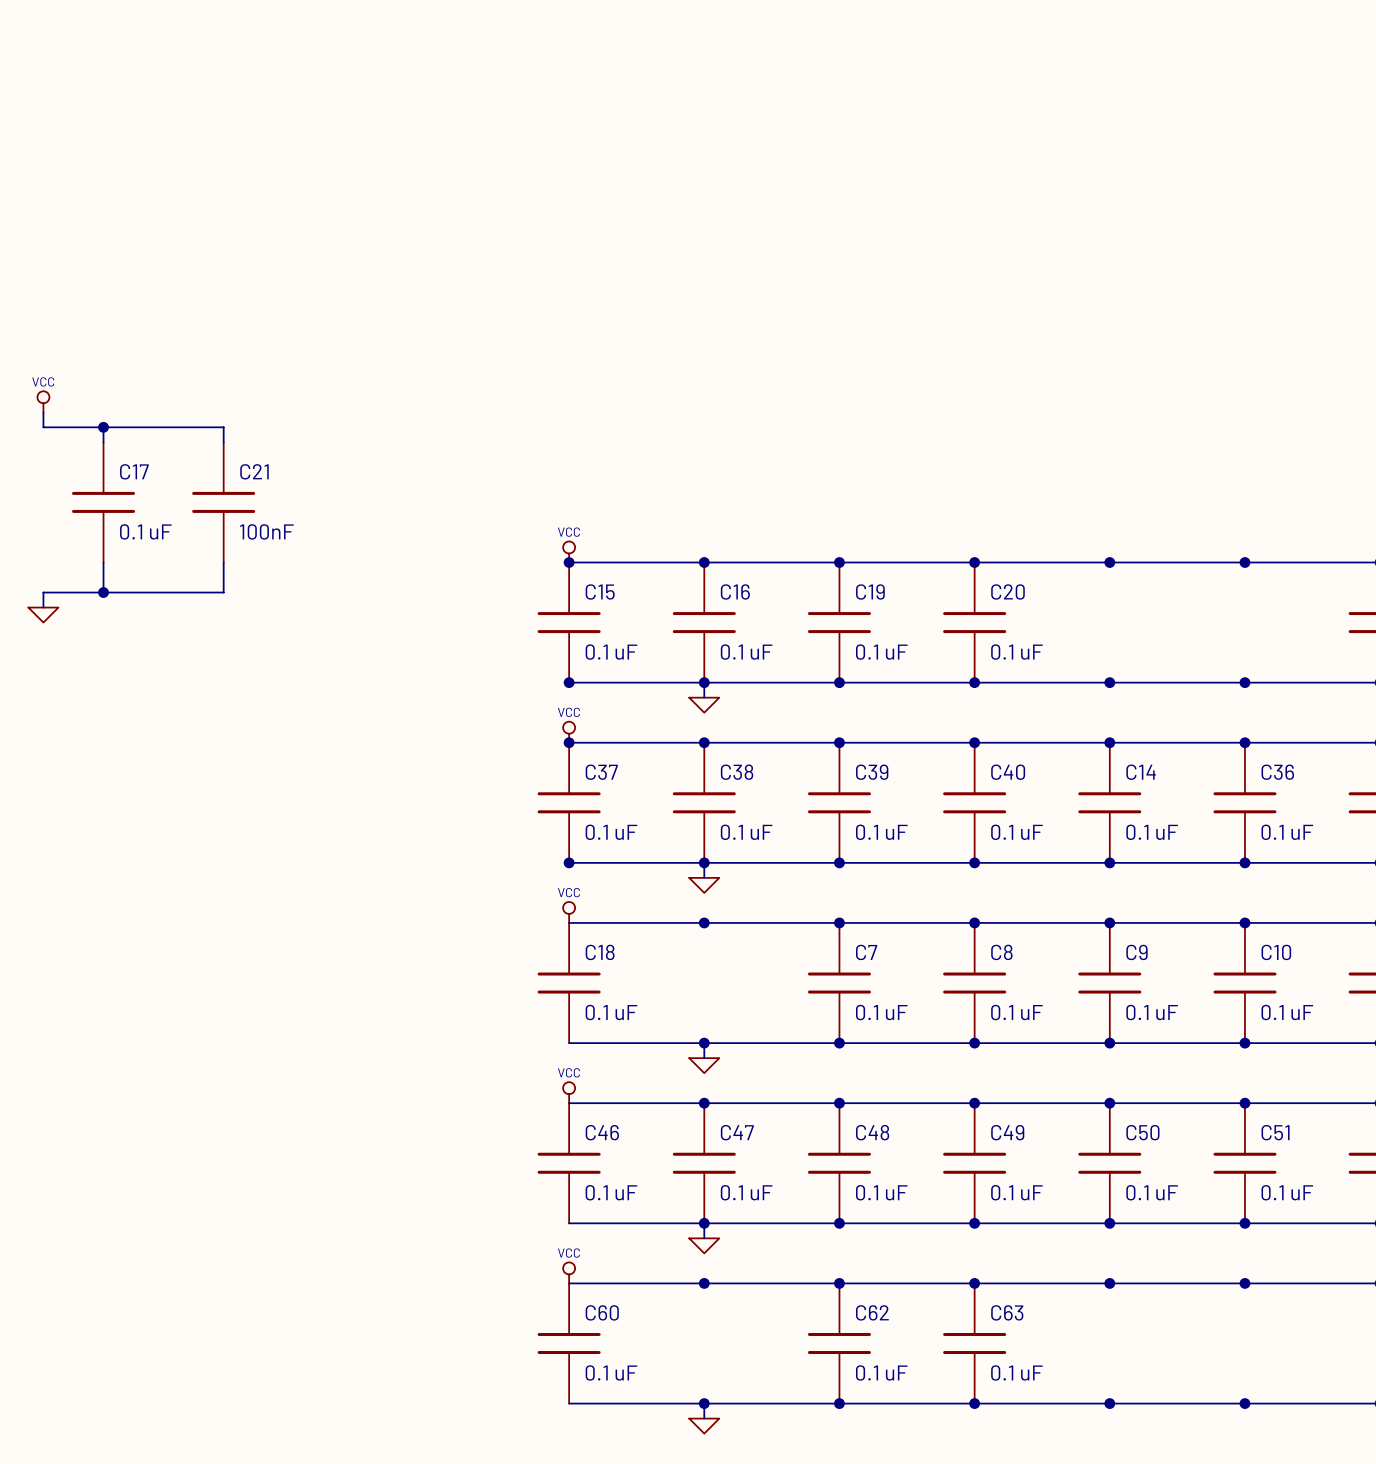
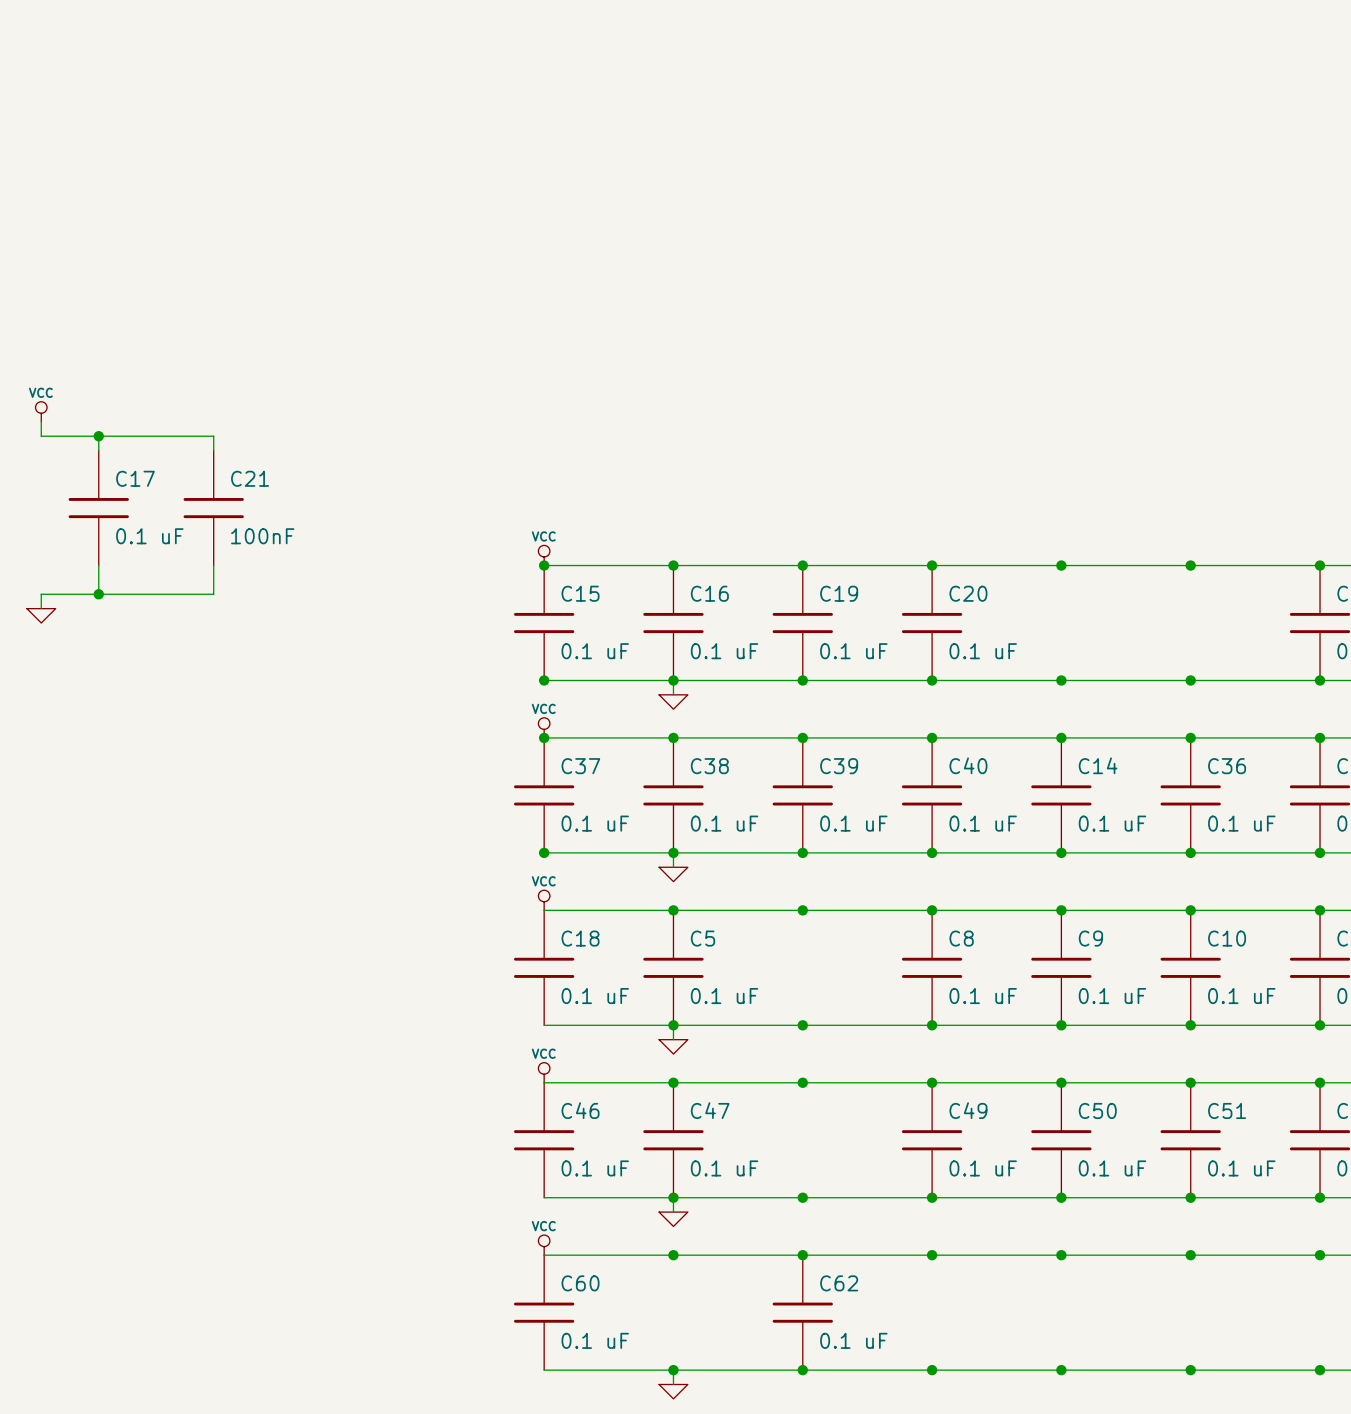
C5: none -> 0.1 uF (673, 967)
C7: 0.1 uF (839, 983) -> none
C48: 0.1 uF (839, 1163) -> none
C63: 0.1 uF (974, 1343) -> none

